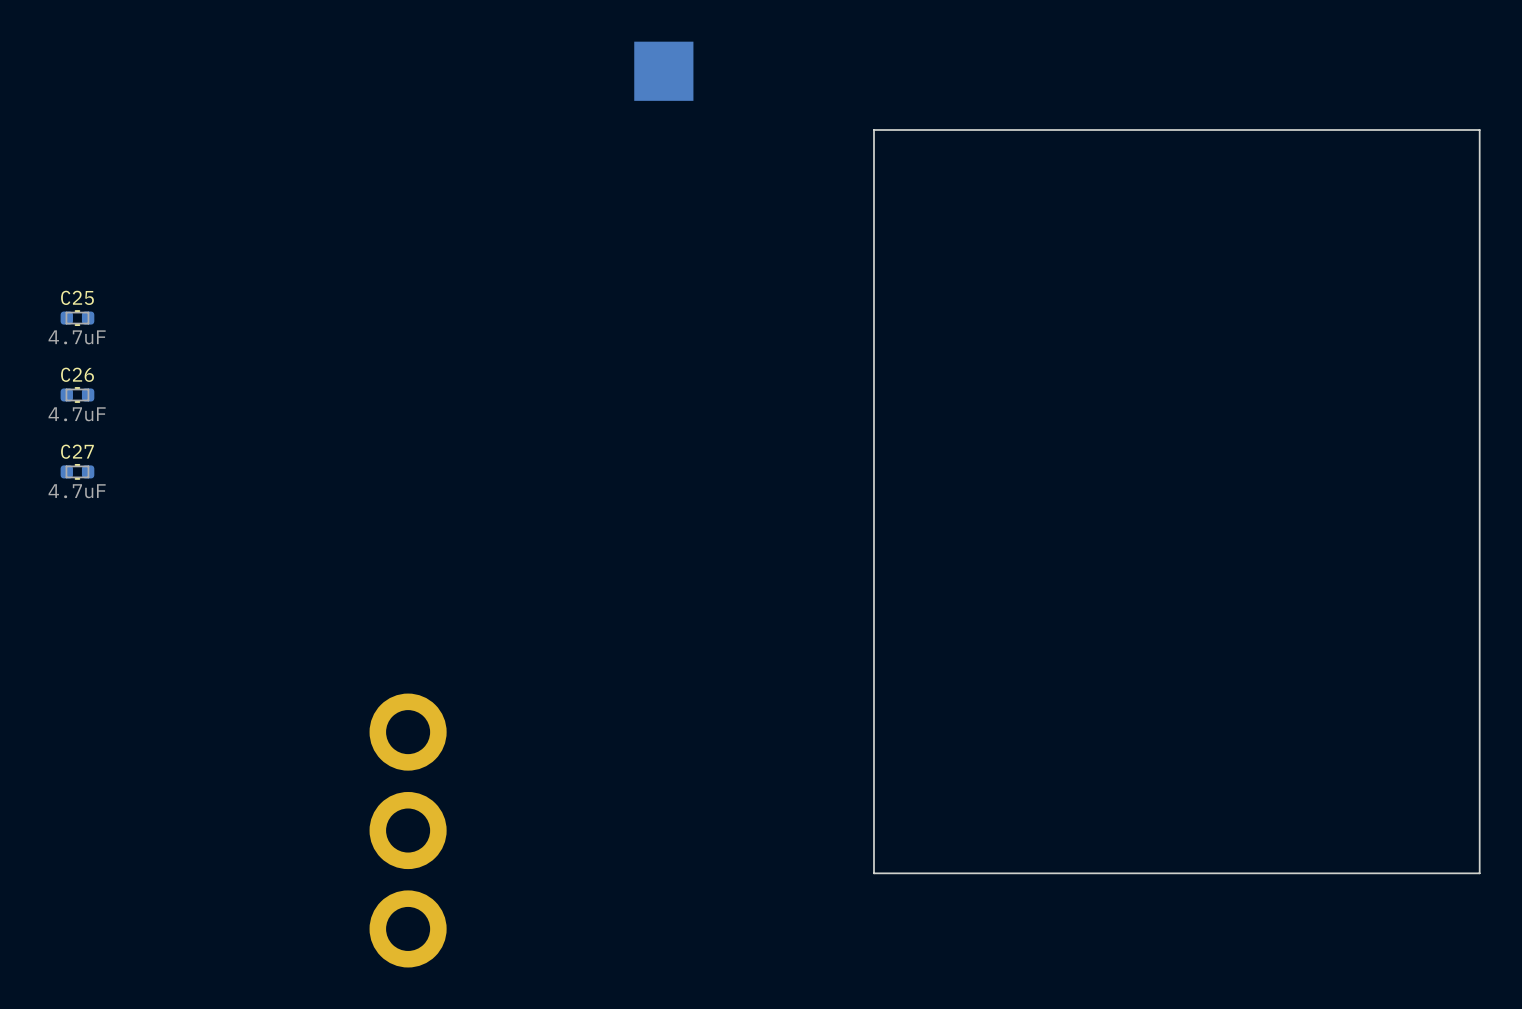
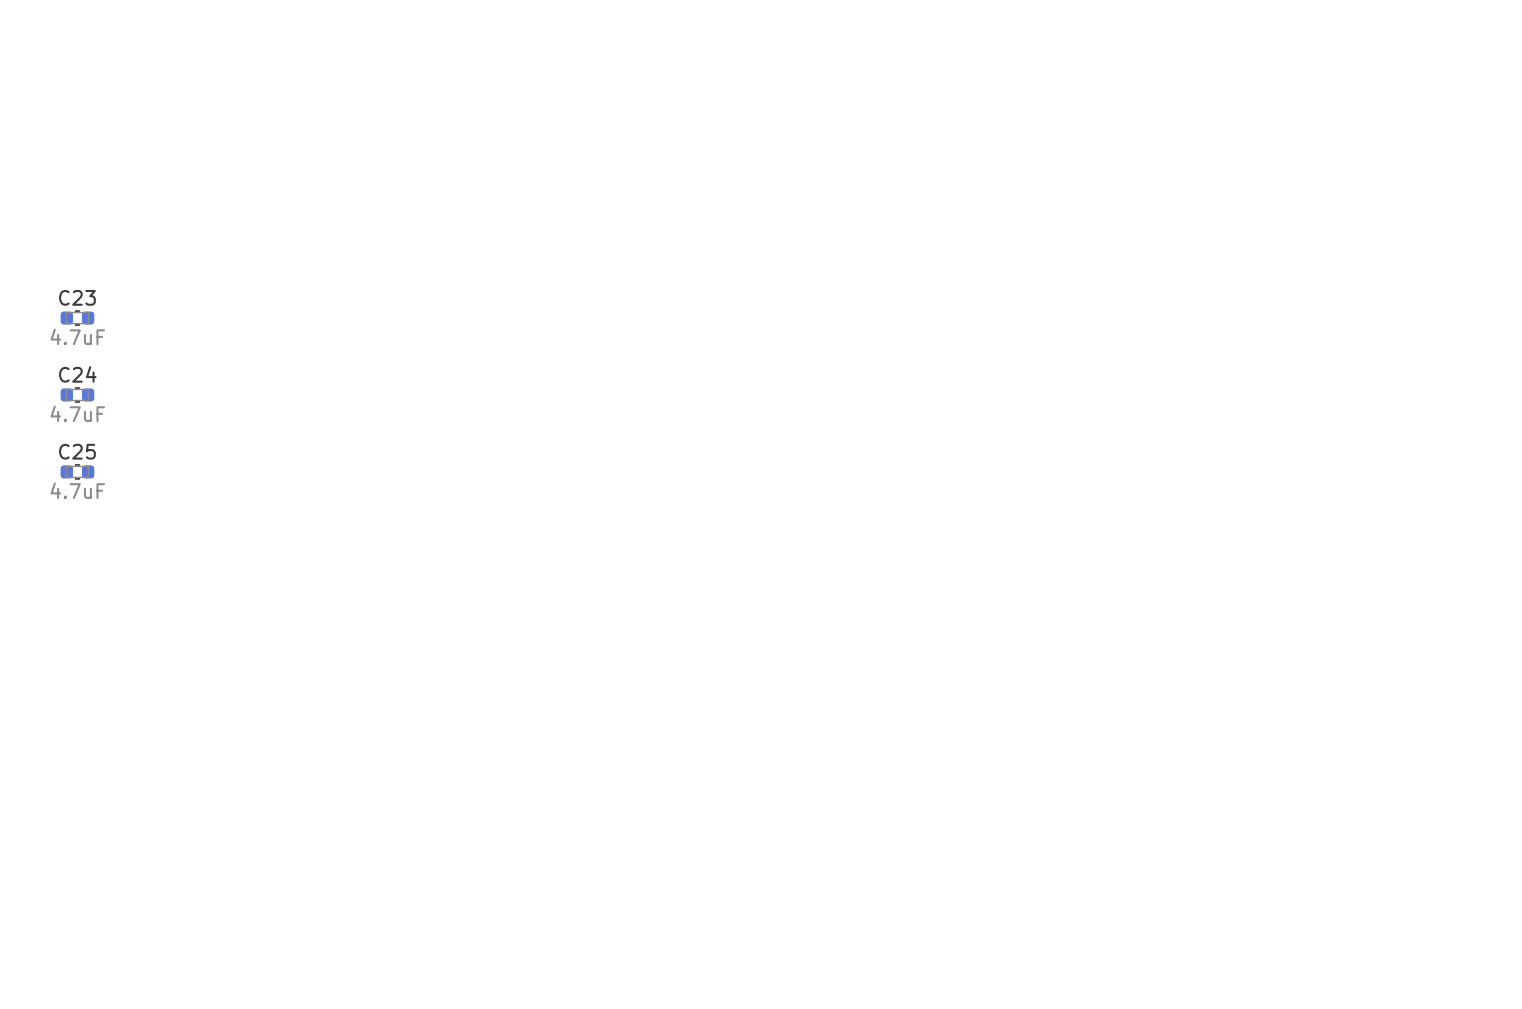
part: (663, 71) -> none
board edge: (1479, 129) (873, 129) (873, 873) (1479, 873) (1479, 129) -> none
C25 name: C25 (77, 297) -> C23 (77, 297)
C26 name: C26 (77, 374) -> C24 (77, 374)
C27 name: C27 (77, 451) -> C25 (77, 451)
part: (408, 732) -> none
part: (408, 830) -> none
part: (408, 928) -> none

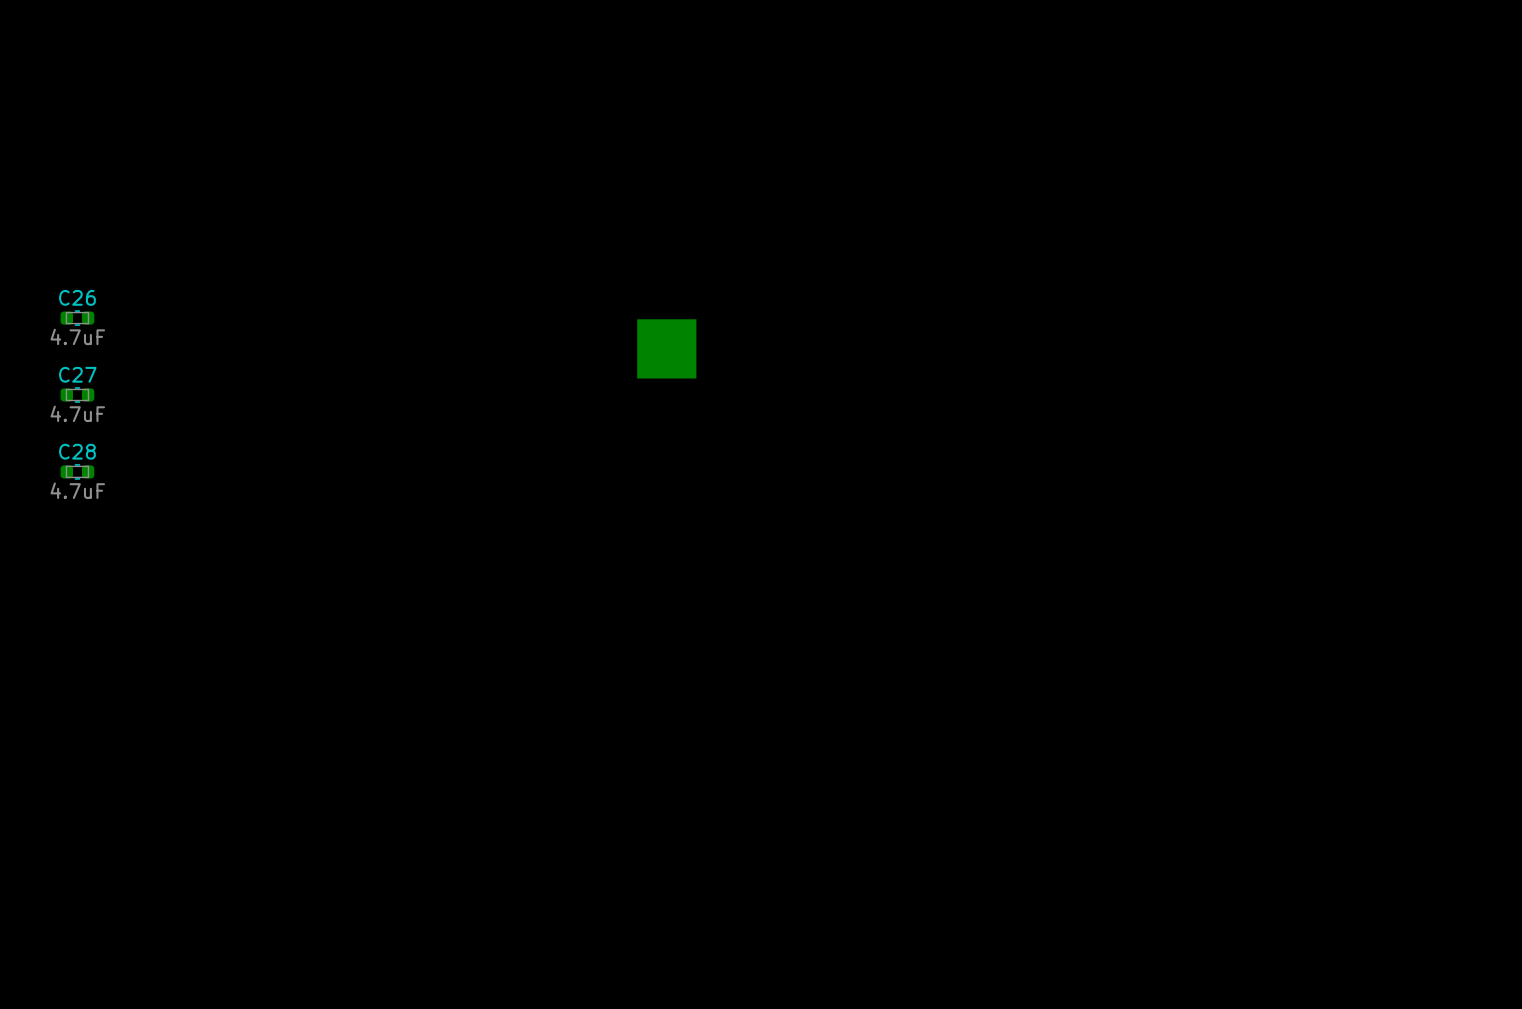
C23 name: C23 (77, 297) -> C26 (77, 297)
part: none -> (666, 348)
C24 name: C24 (77, 374) -> C27 (77, 374)
C25 name: C25 (77, 451) -> C28 (77, 451)

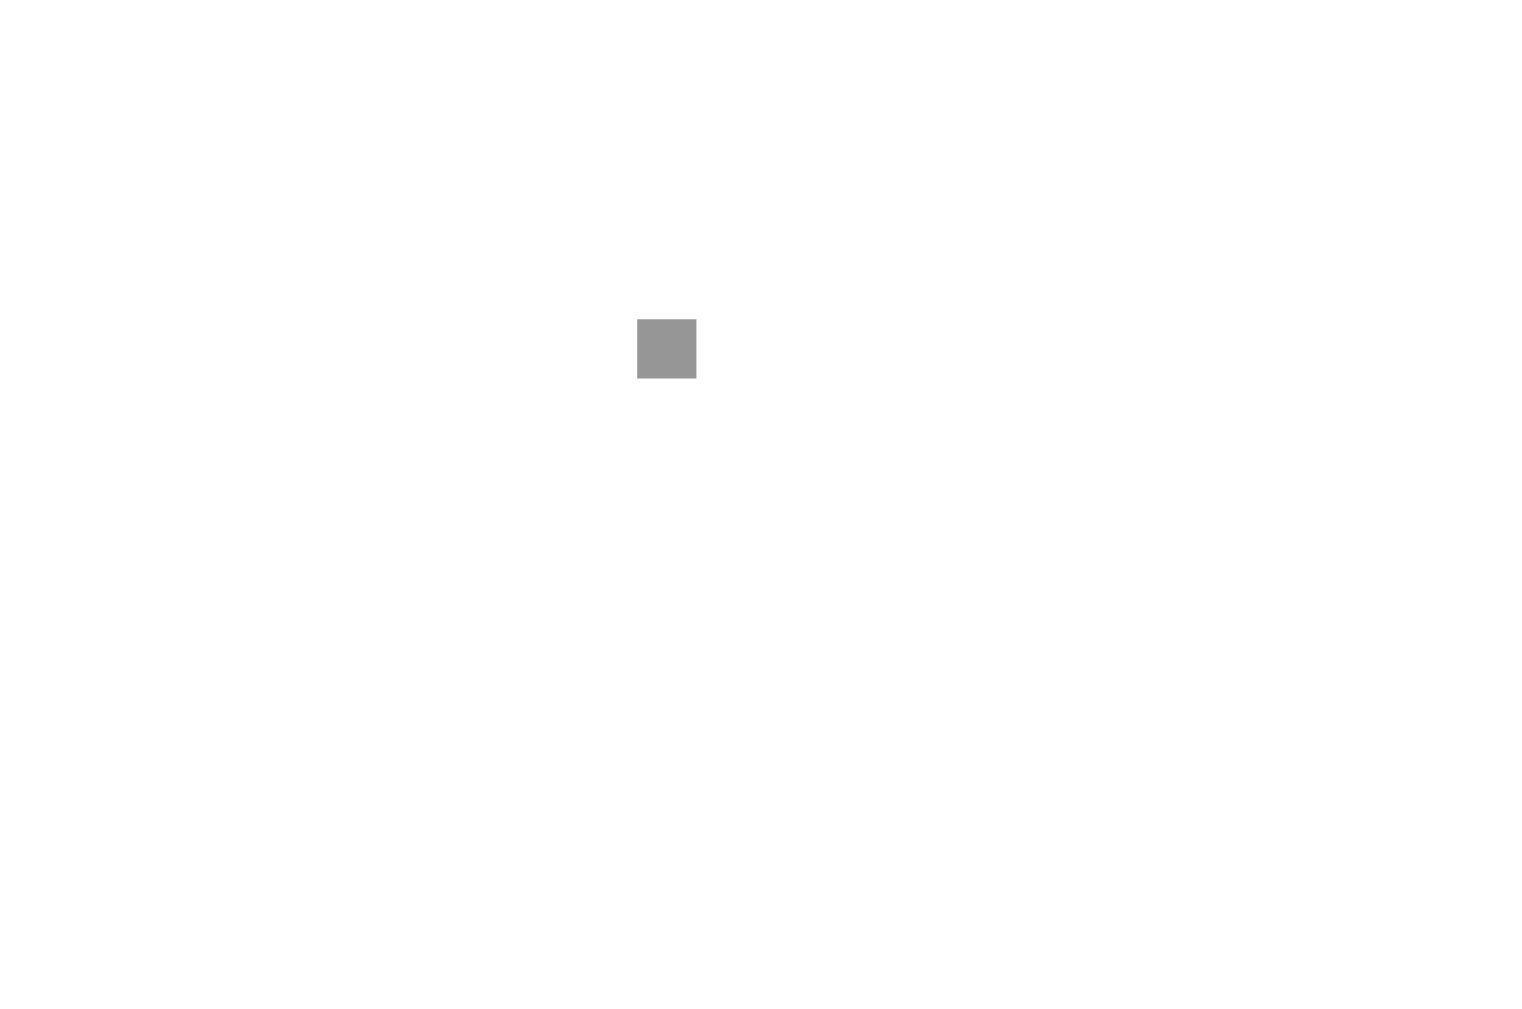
C26: 4.7uF (77, 318) -> none
C27: 4.7uF (77, 394) -> none
C28: 4.7uF (77, 471) -> none

